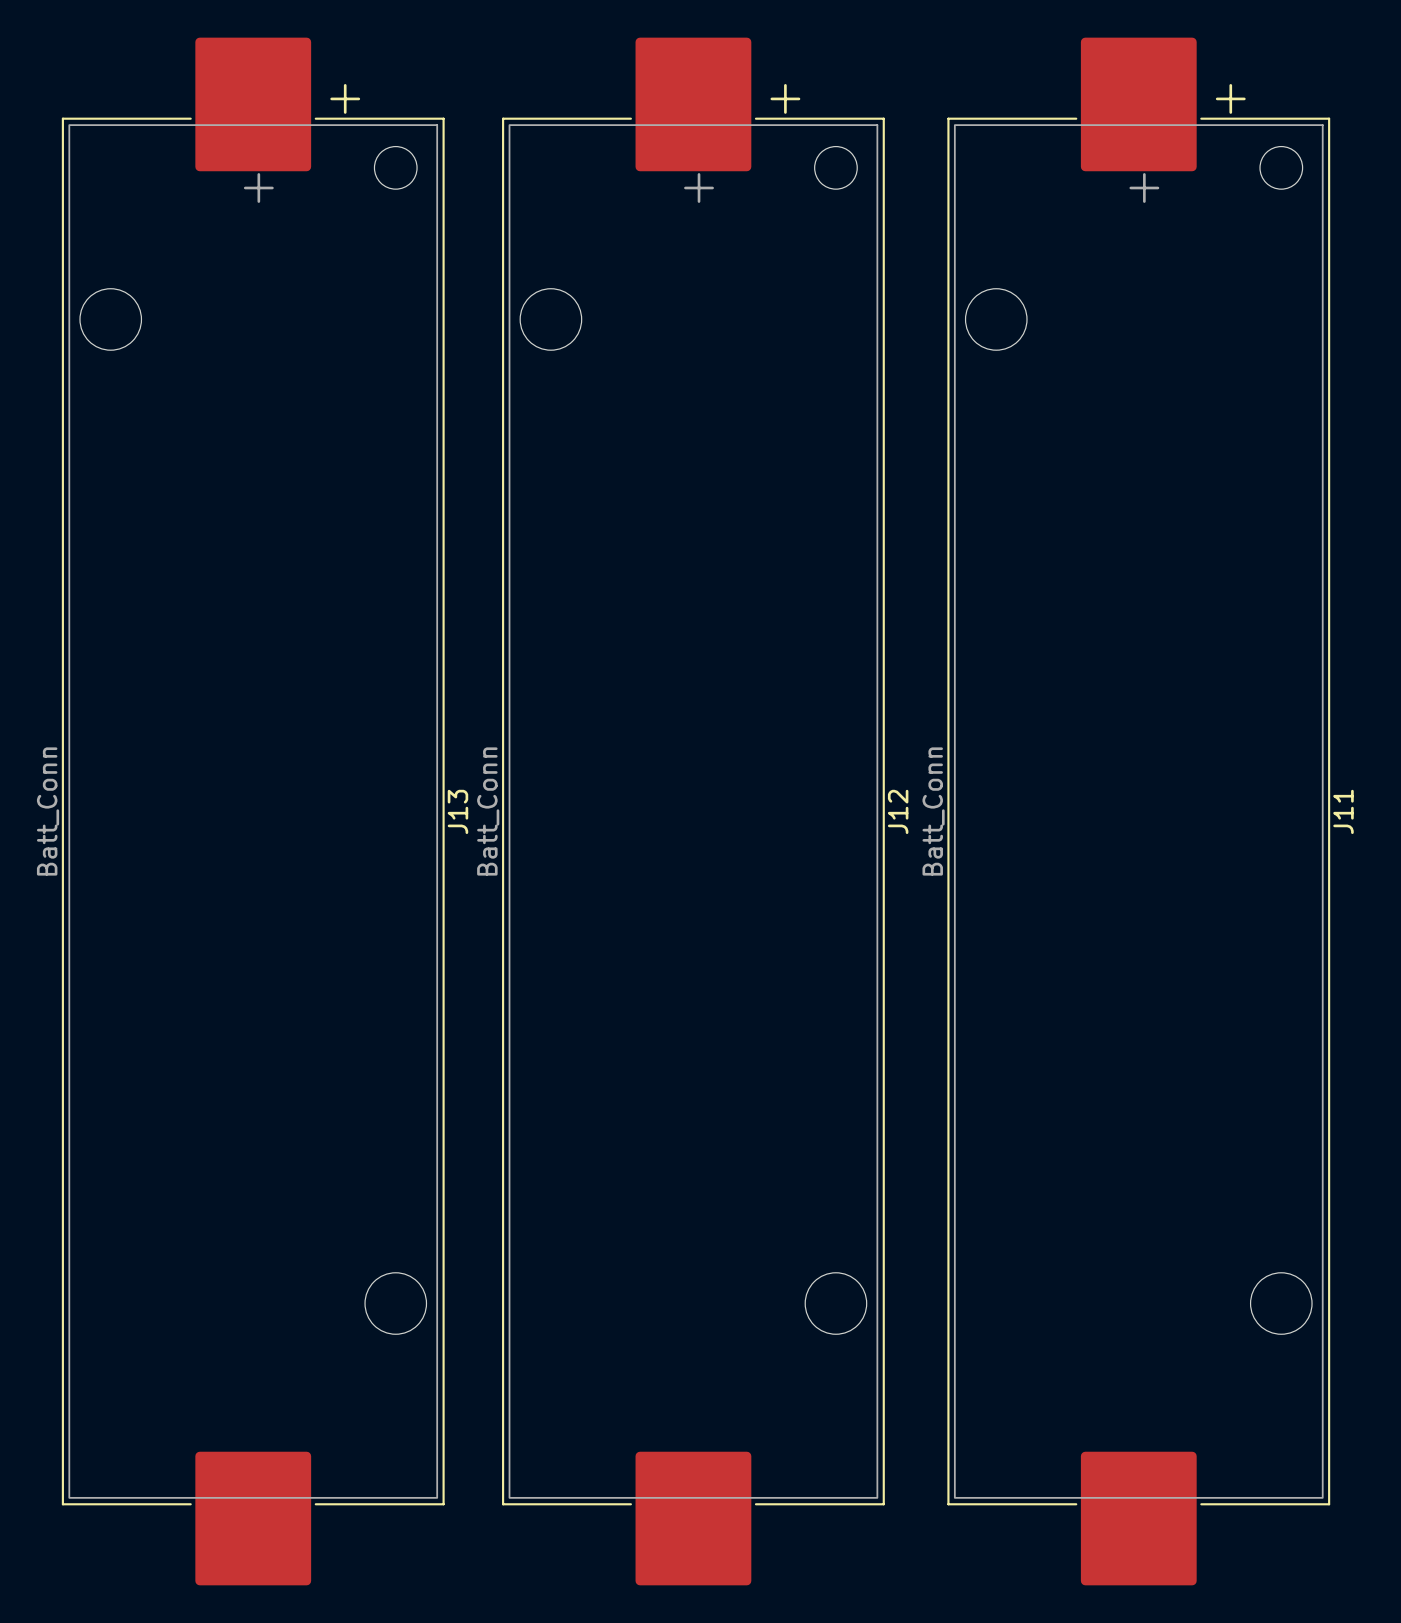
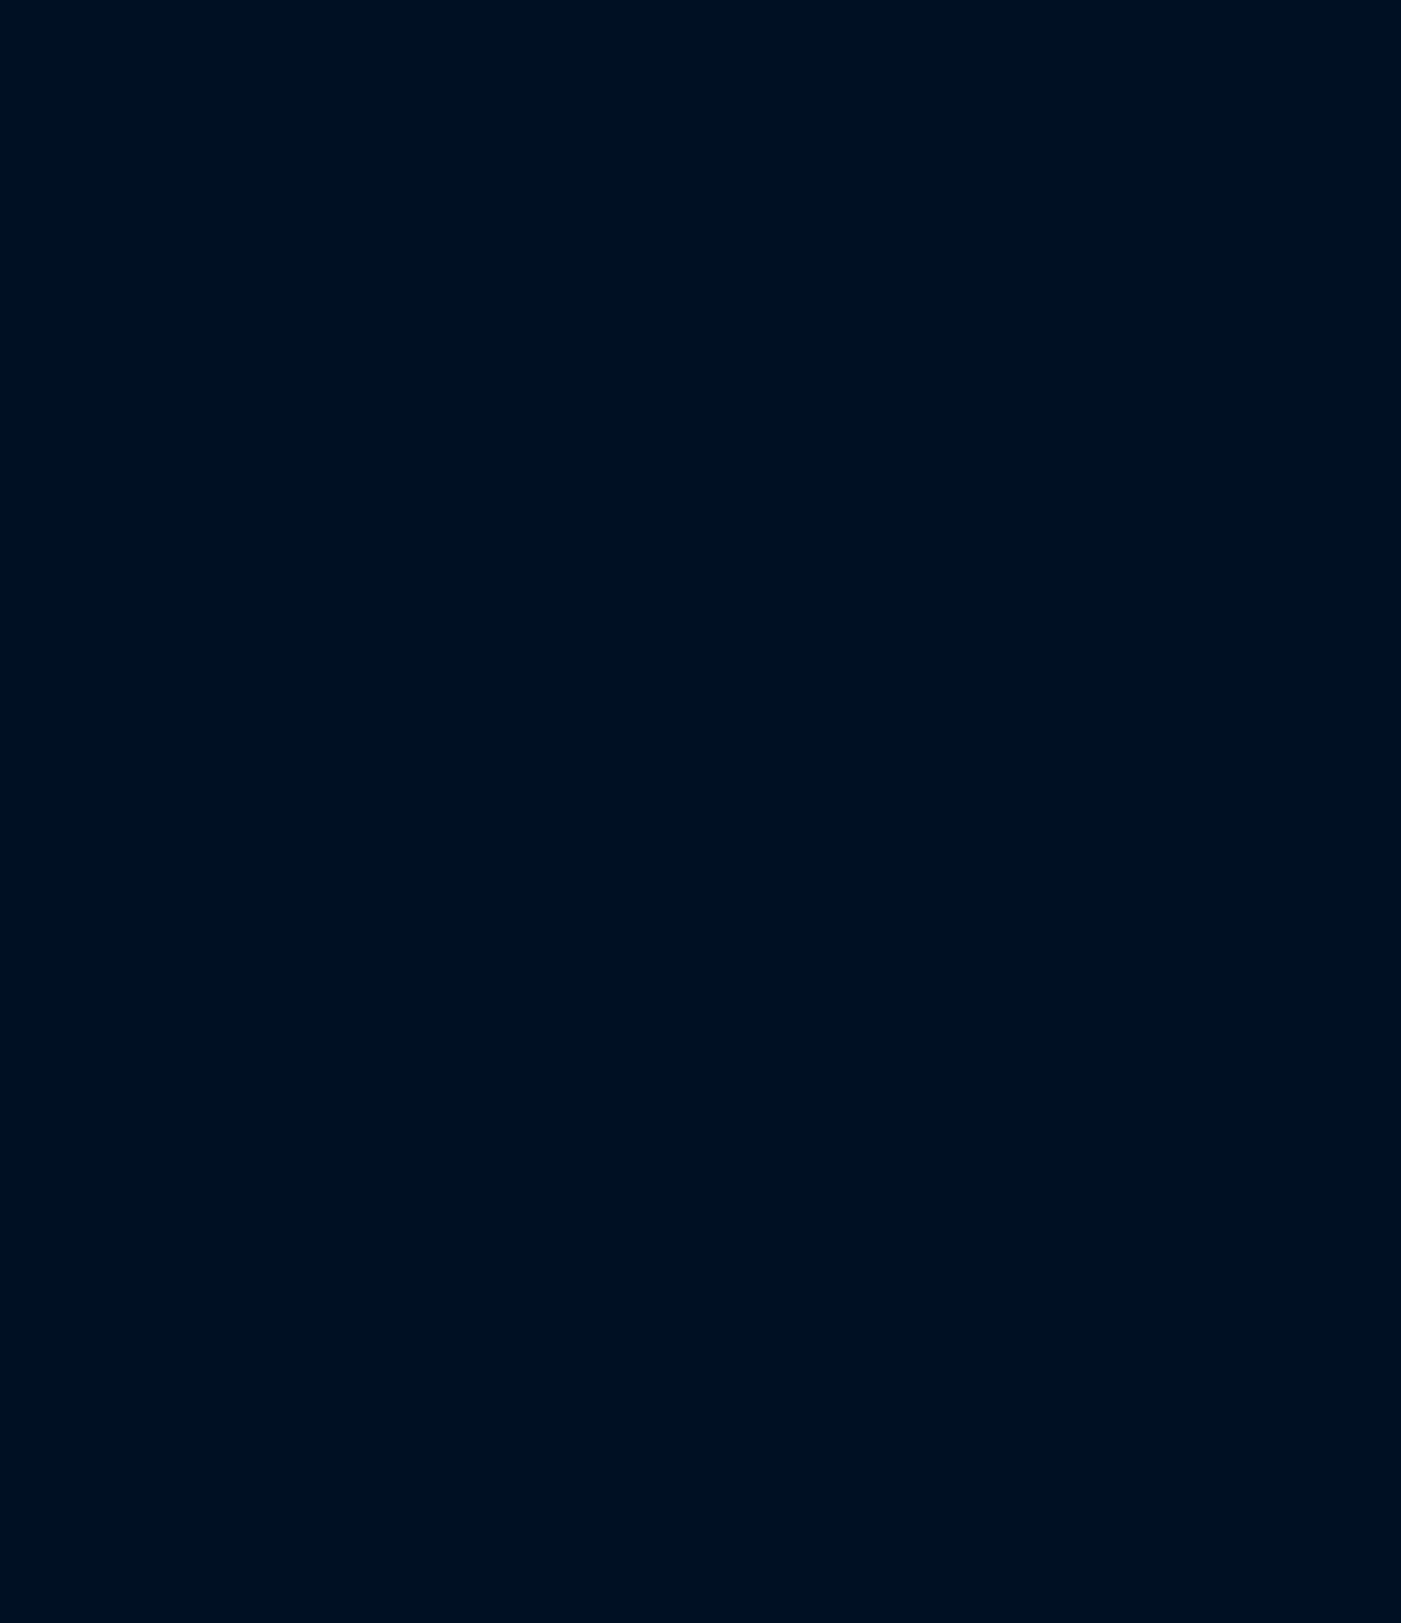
J13: Batt_Conn (253, 811) -> none
J12: Batt_Conn (693, 811) -> none
J11: Batt_Conn (1138, 811) -> none

